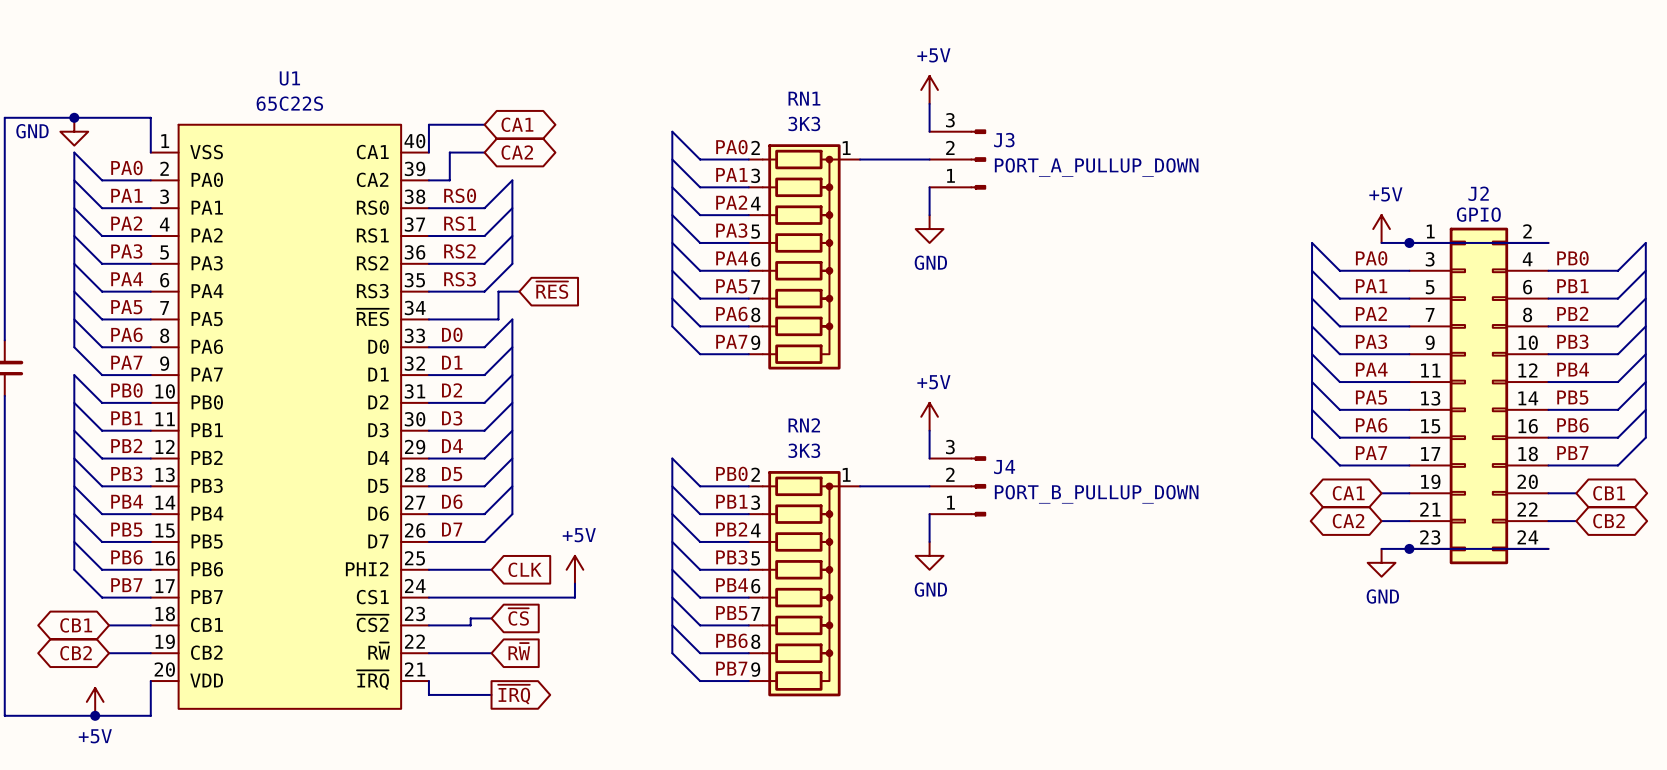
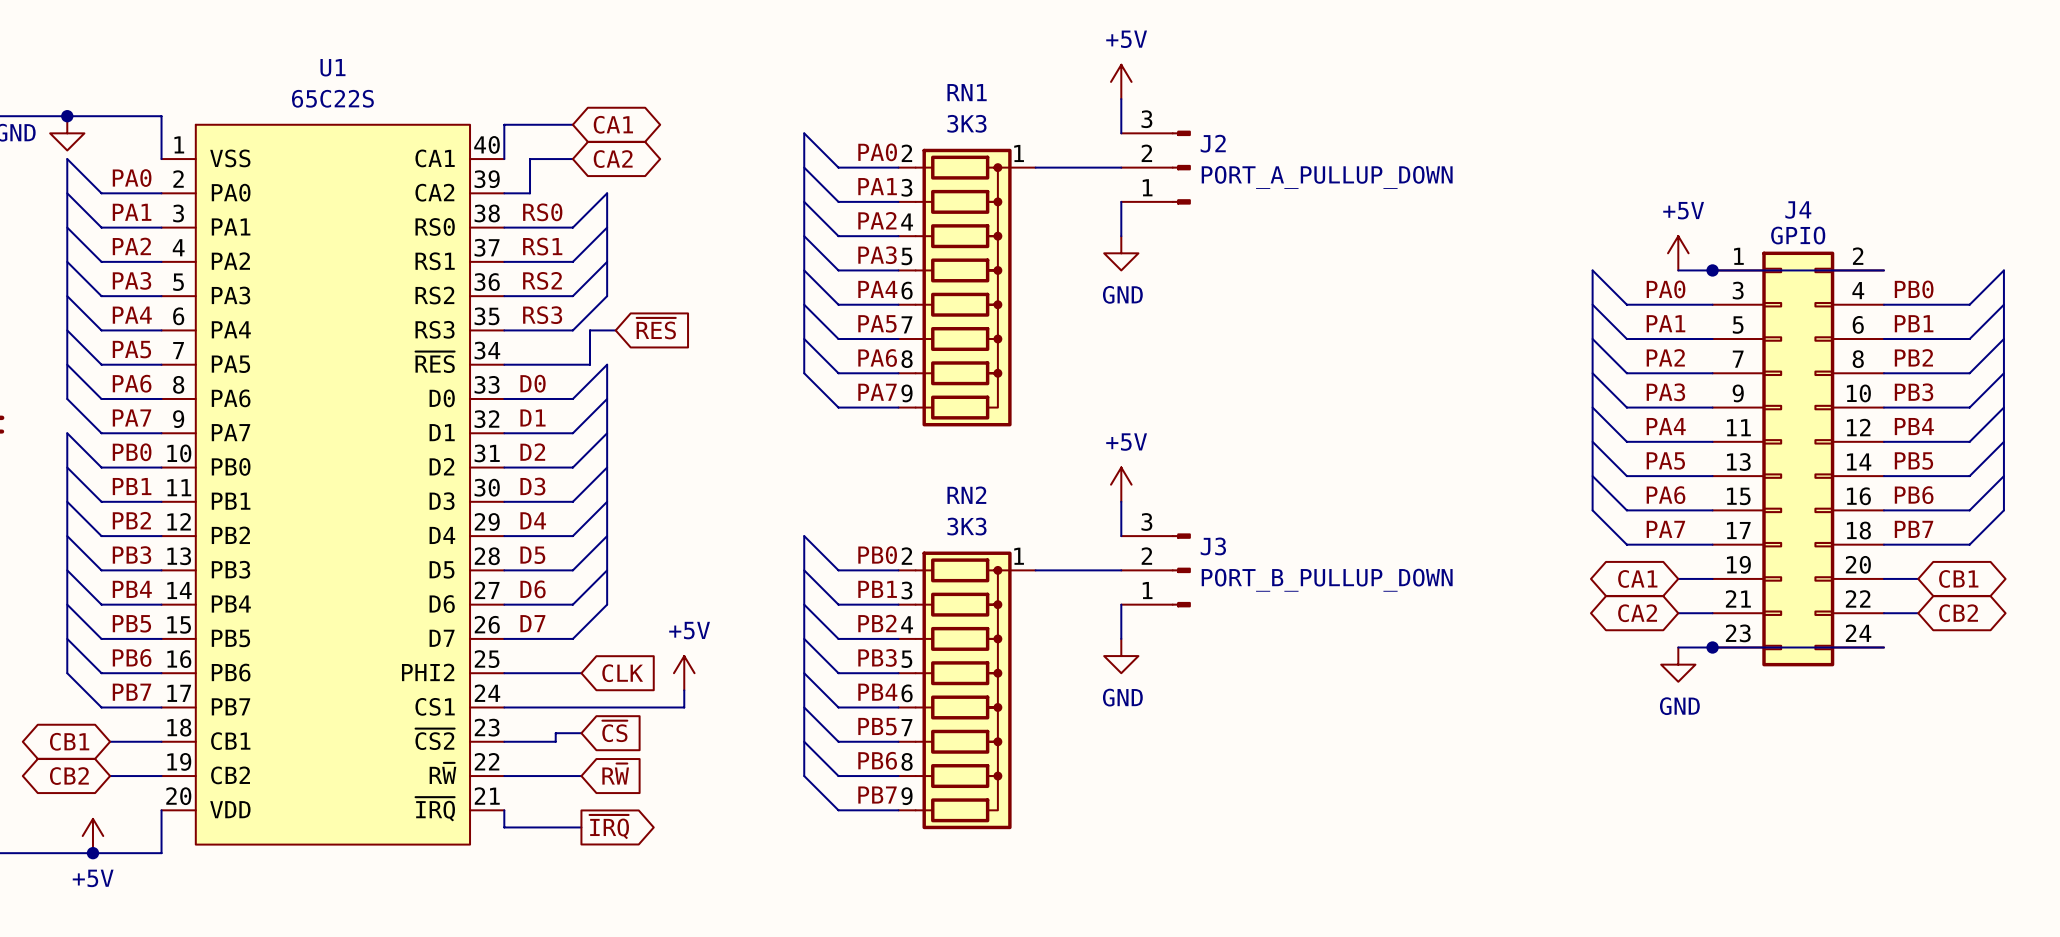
J3 name: J3 (1004, 140) -> J2 (1213, 143)
J2 name: J2 (1478, 193) -> J4 (1798, 209)
J4 name: J4 (1004, 467) -> J3 (1213, 546)

